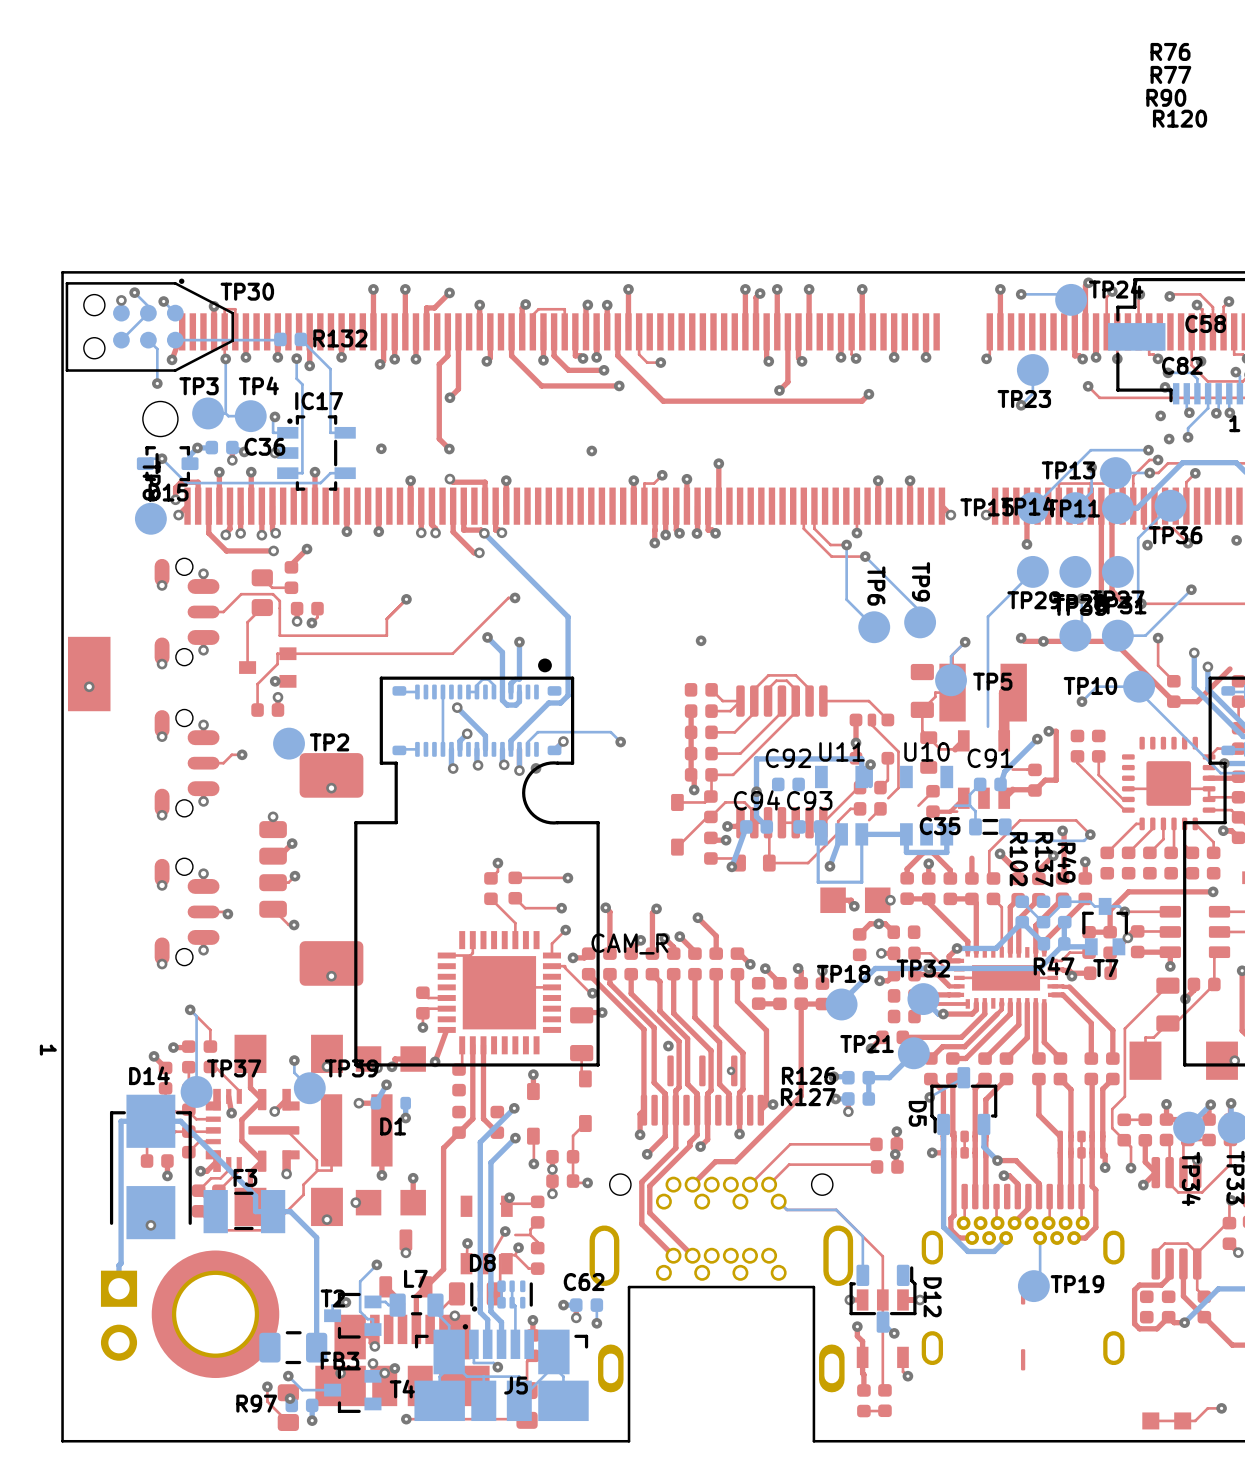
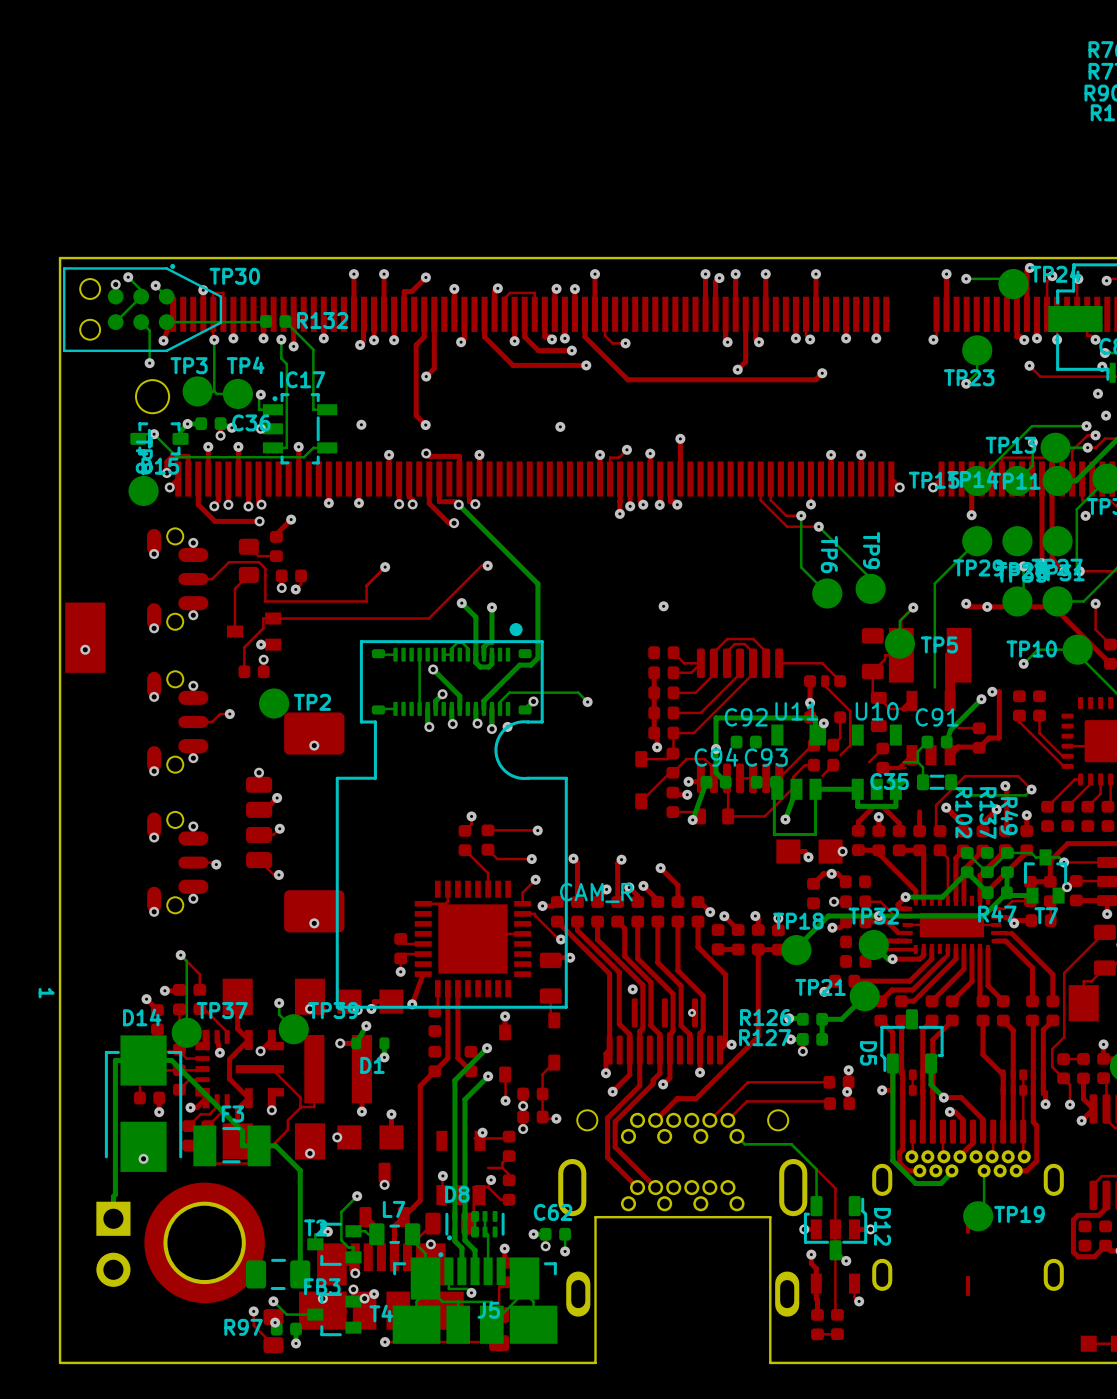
bottom track: (963, 1077) (929, 1097) -> none
via: (929, 1097) -> none
top track: (505, 1231) (486, 1263) -> none
via: (505, 1231) -> none

